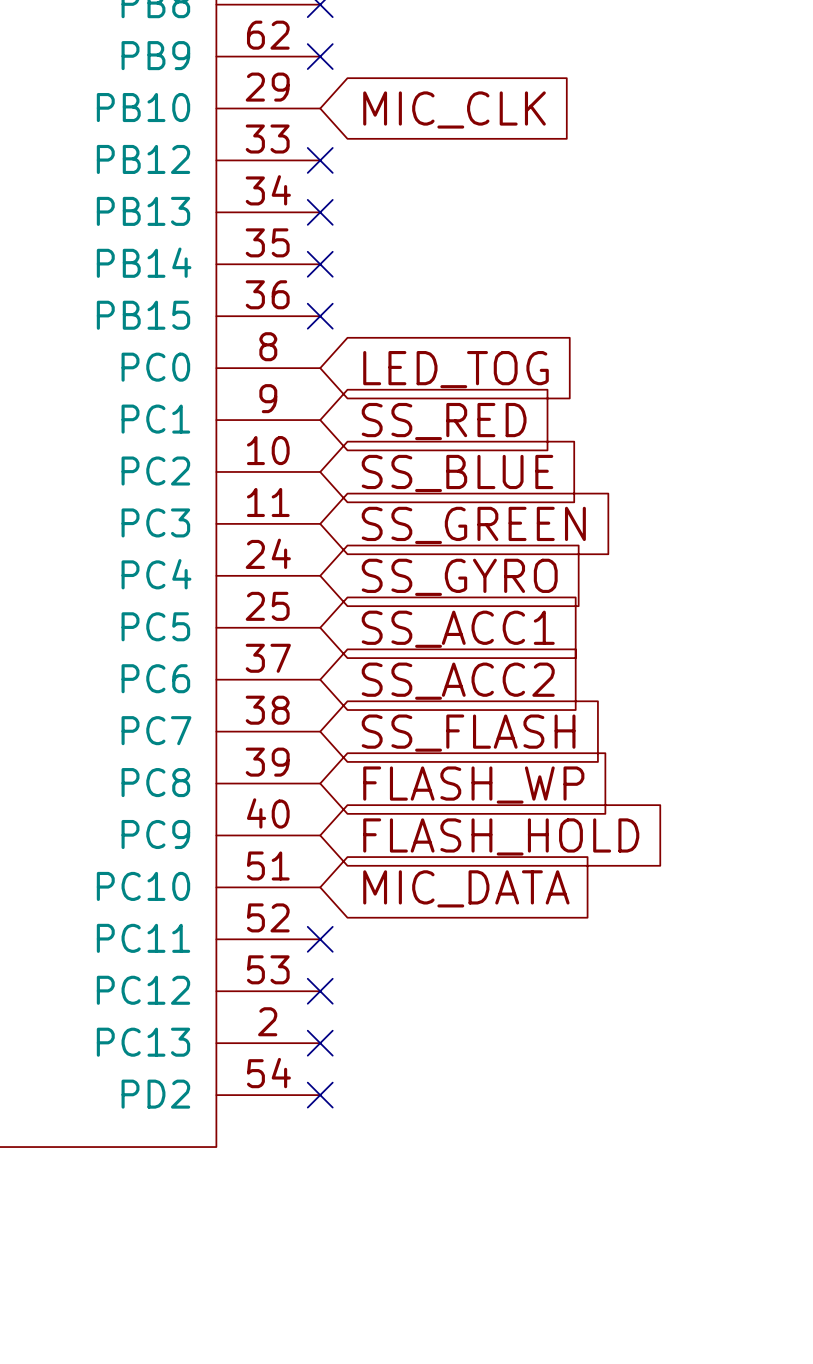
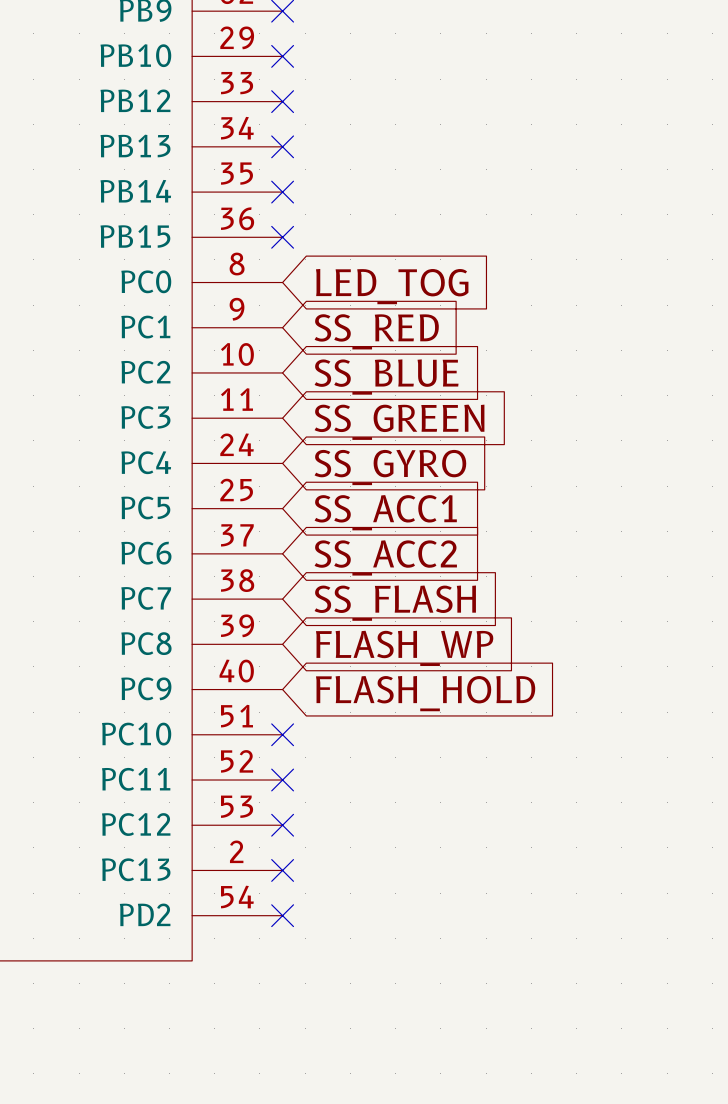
no-connect mark: none -> (282, 56)
global label: MIC_CLK (454, 109) -> none
no-connect mark: none -> (282, 734)
global label: MIC_DATA (466, 888) -> none

